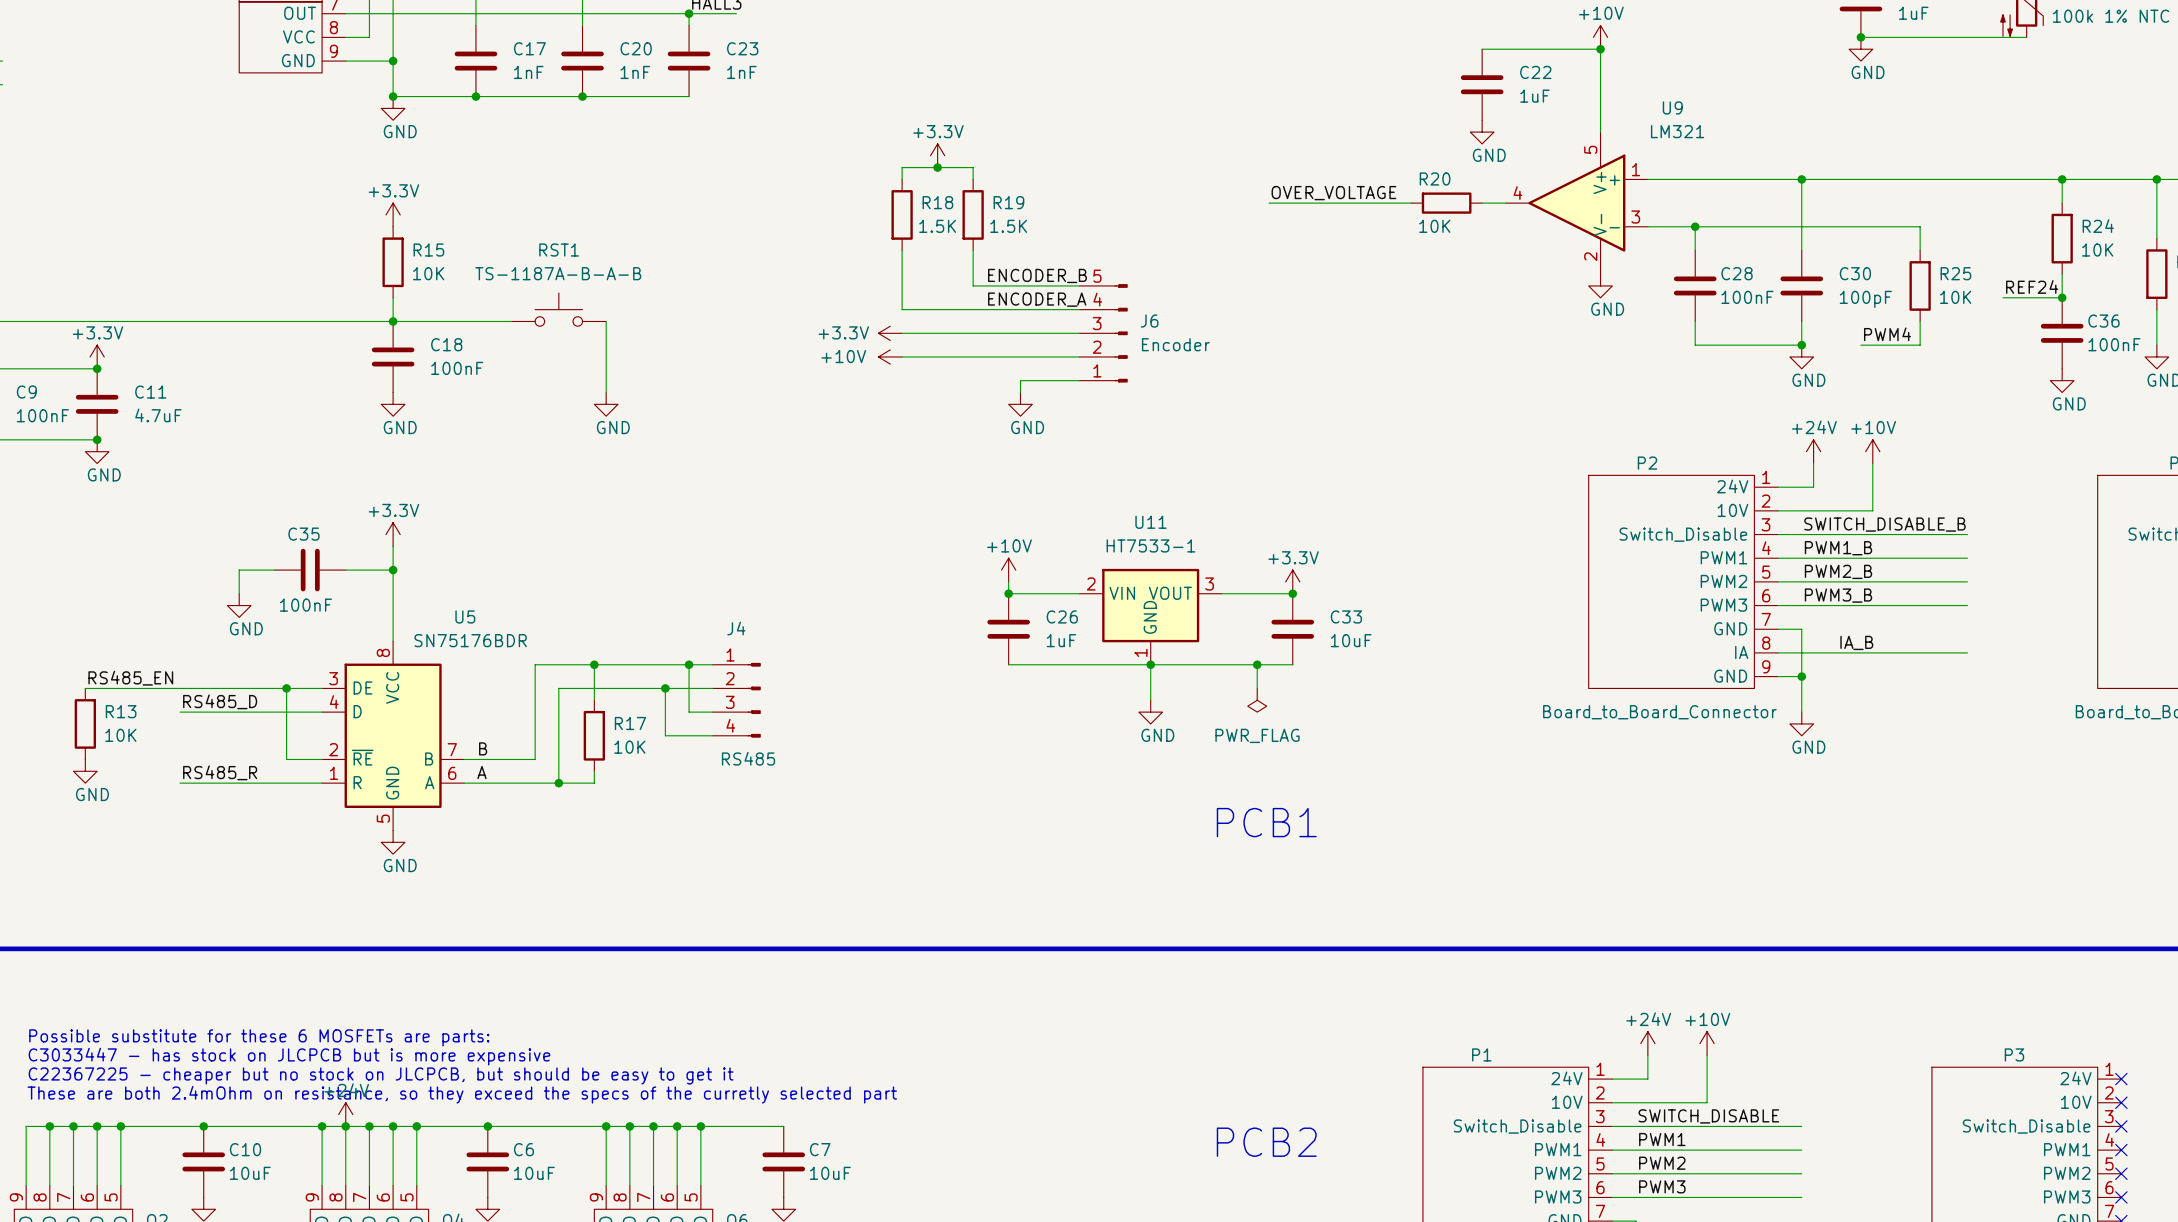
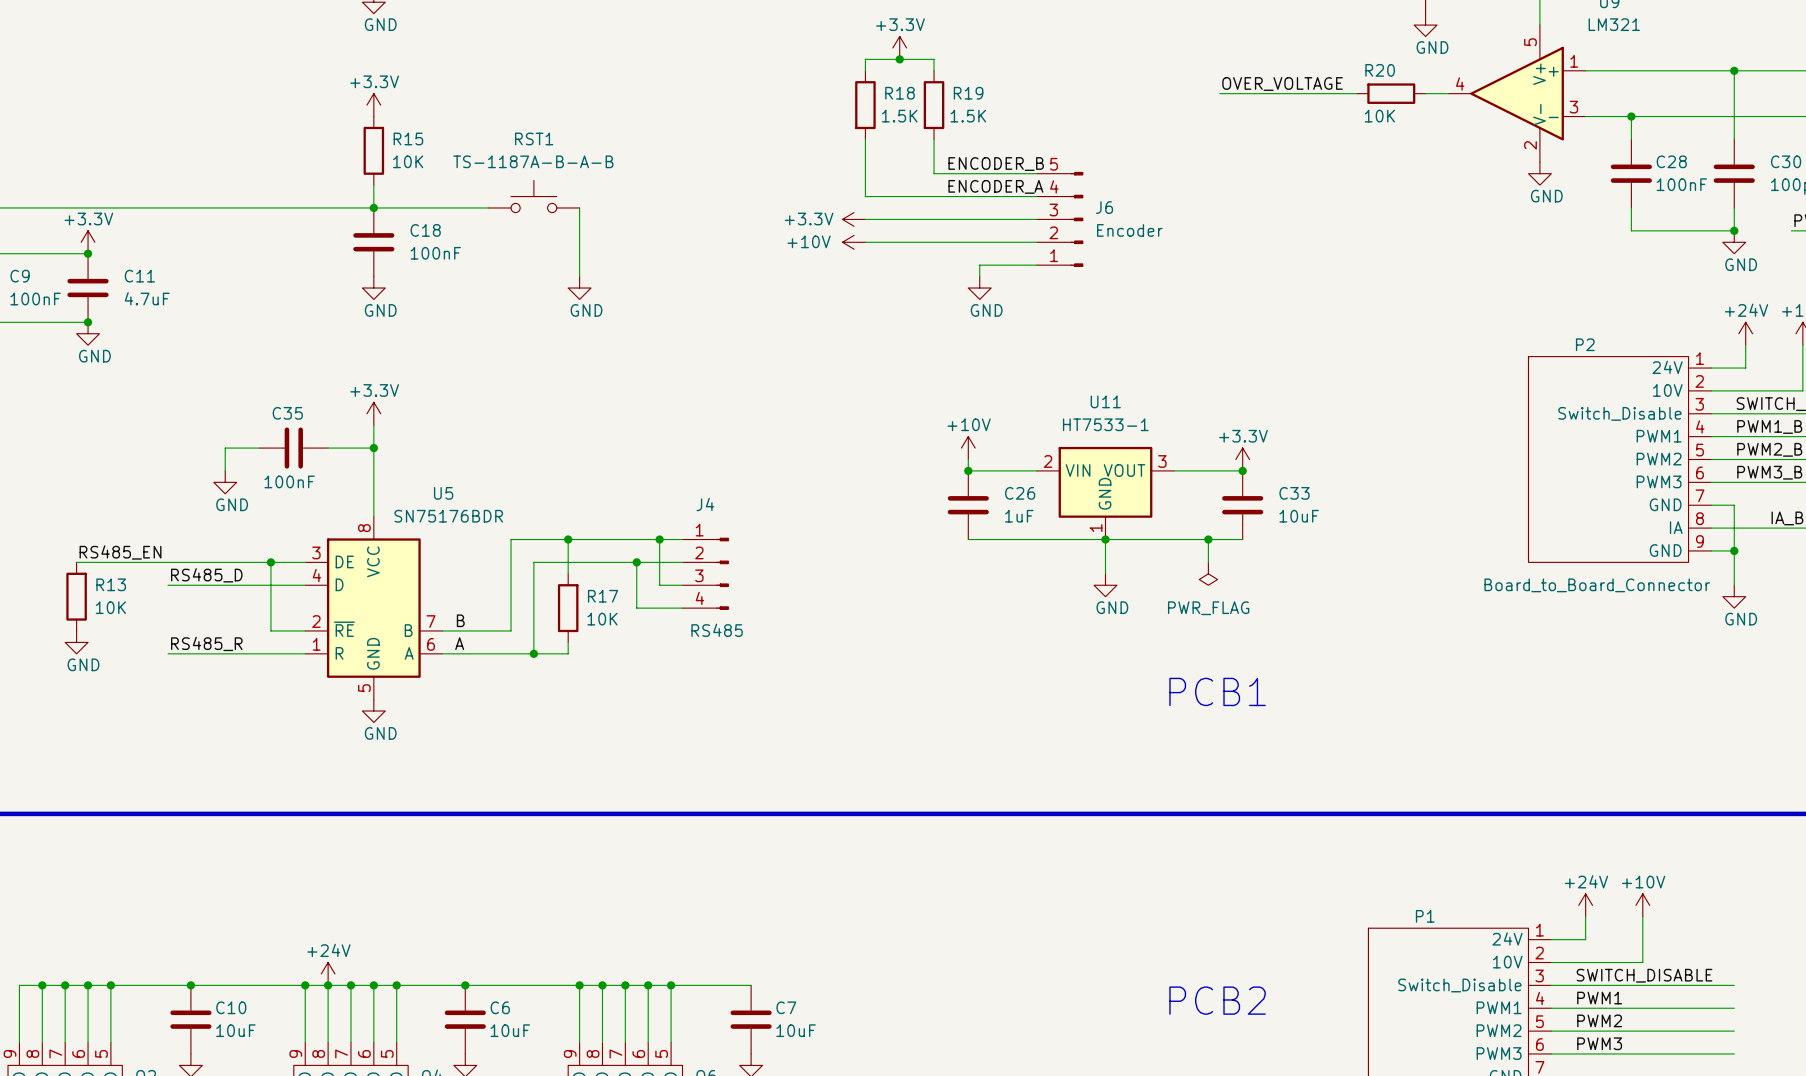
text: Possible substitute for these 6 MOSFETs are parts: (259, 1037) -> none
text: C3033447 - has stock on JLCPCB but is more expensive (289, 1056) -> none
text: C22367225 - cheaper but no stock on JLCPCB, but should be easy to get it (381, 1075) -> none
text: These are both 2.4mOhm on resistance, so they exceed the specs of the curretly selected part (462, 1094) -> none

